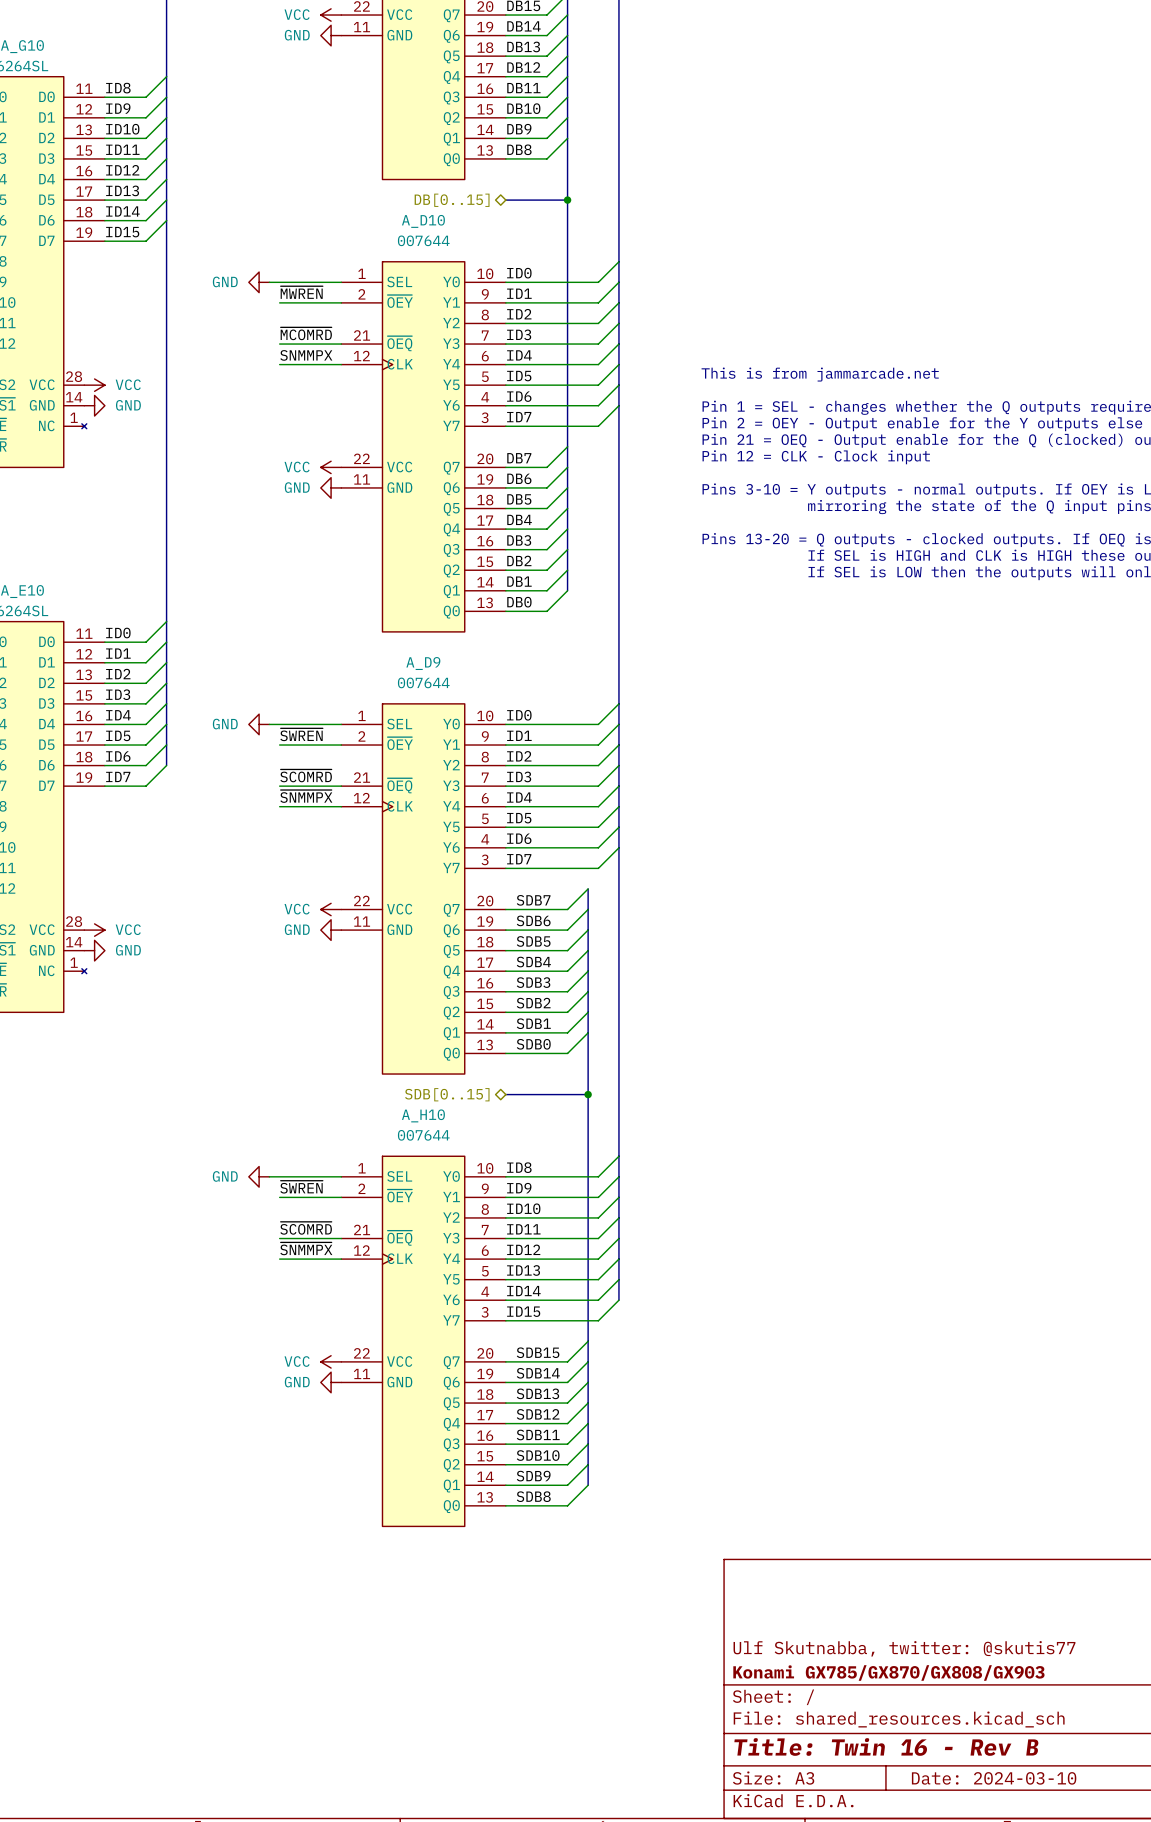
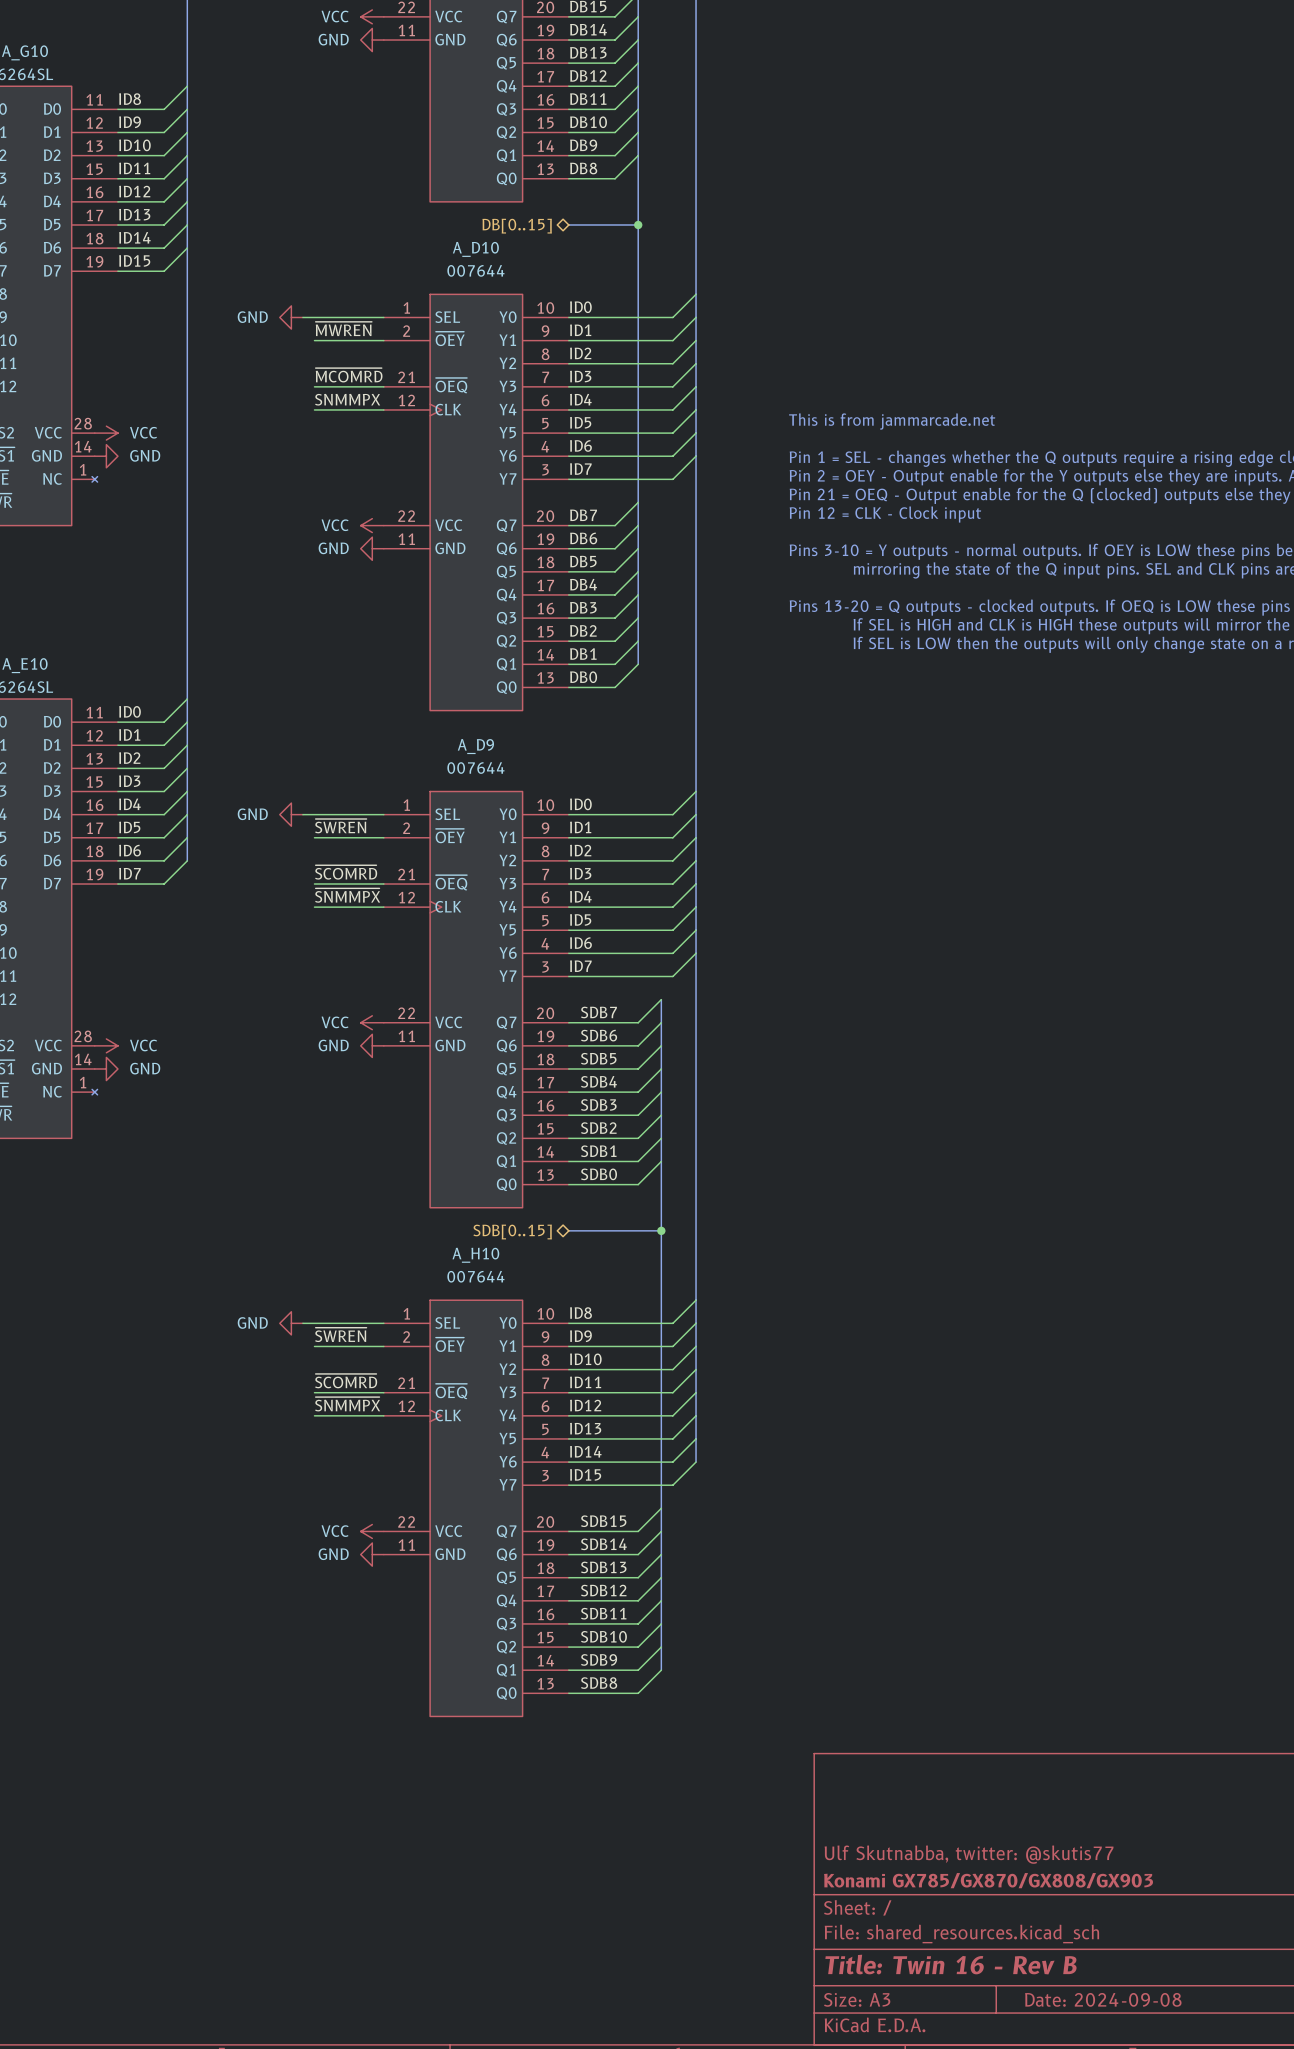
title block: Date: 2024-03-10 (994, 1778) -> Date: 2024-09-08 (1103, 1999)

